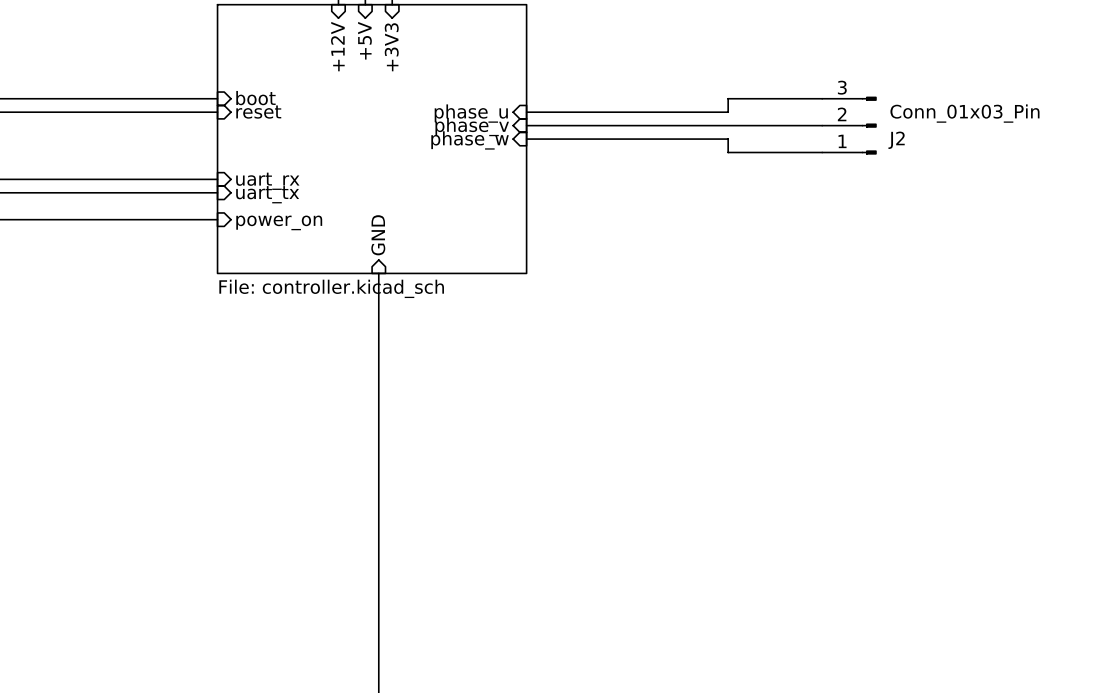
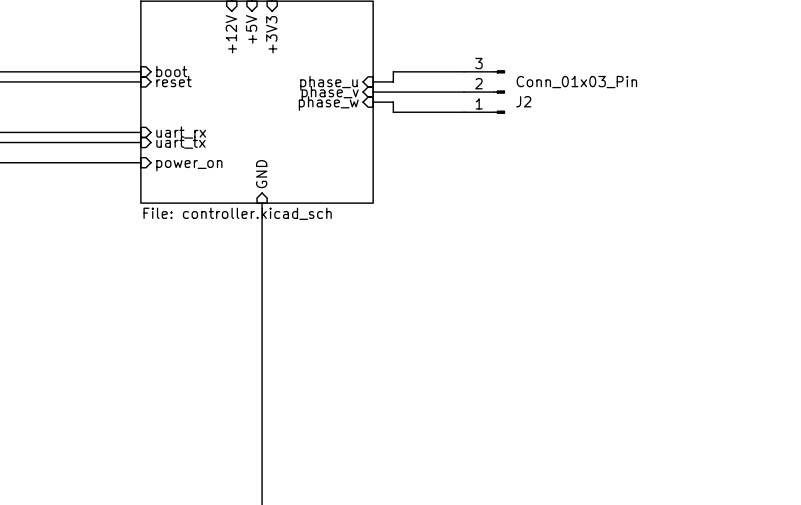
wire: (822, 98) (728, 98) (728, 112) (553, 112) -> (464, 71) (393, 71) (393, 81)
wire: (647, 125) (822, 125) -> none
J2 position: (849, 125) -> (484, 92)
wire: (553, 139) (728, 139) (728, 152) (822, 152) -> (393, 102) (393, 112) (464, 112)

